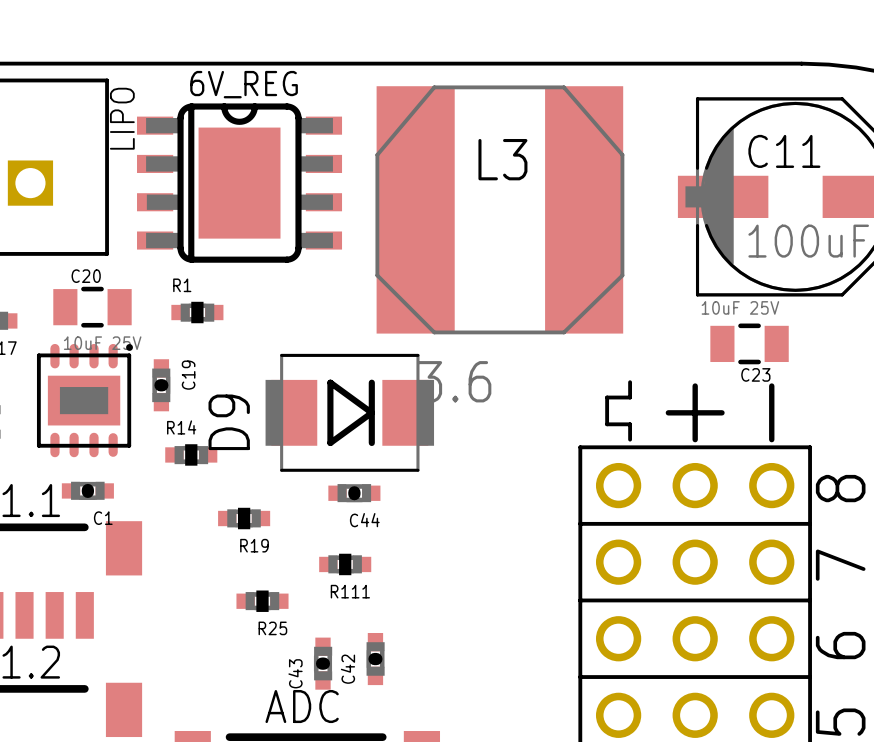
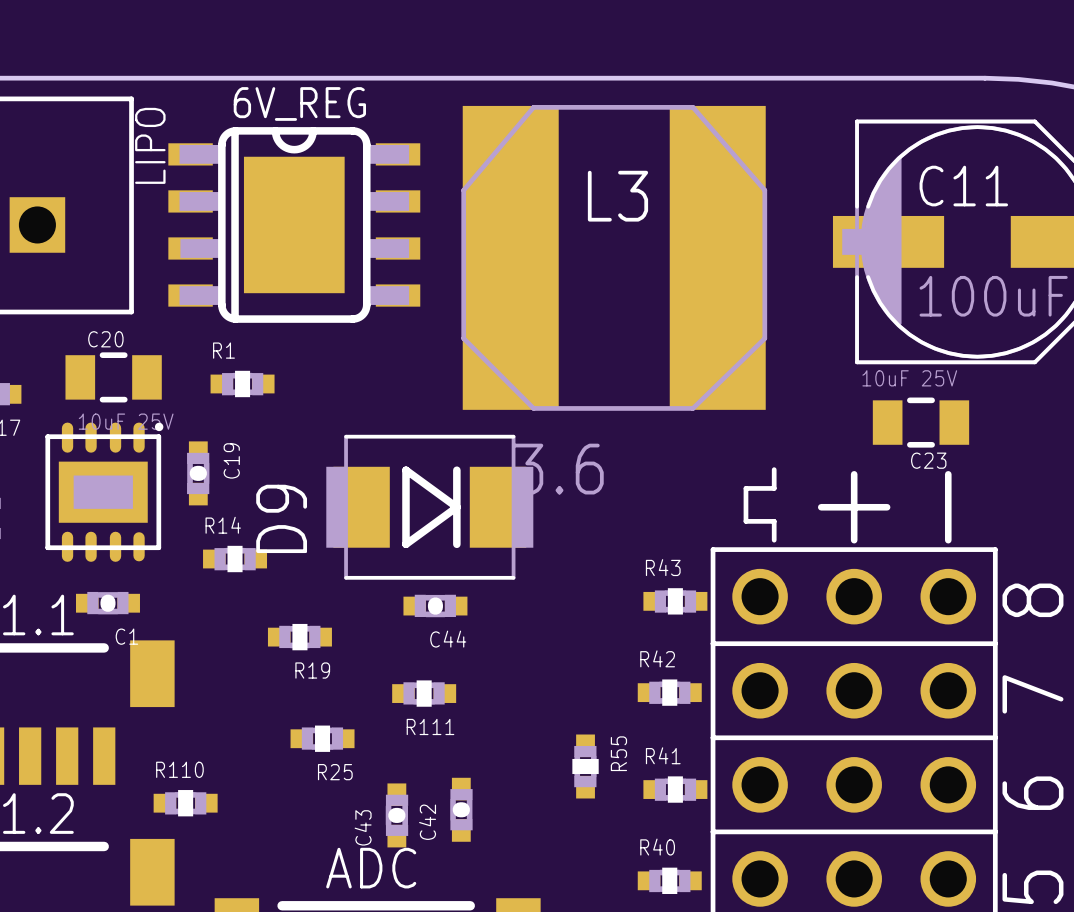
R43: none -> (675, 601)
R42: none -> (669, 692)
R55: none -> (585, 766)
R41: none -> (675, 789)
R110: none -> (185, 803)
R40: none -> (669, 880)

